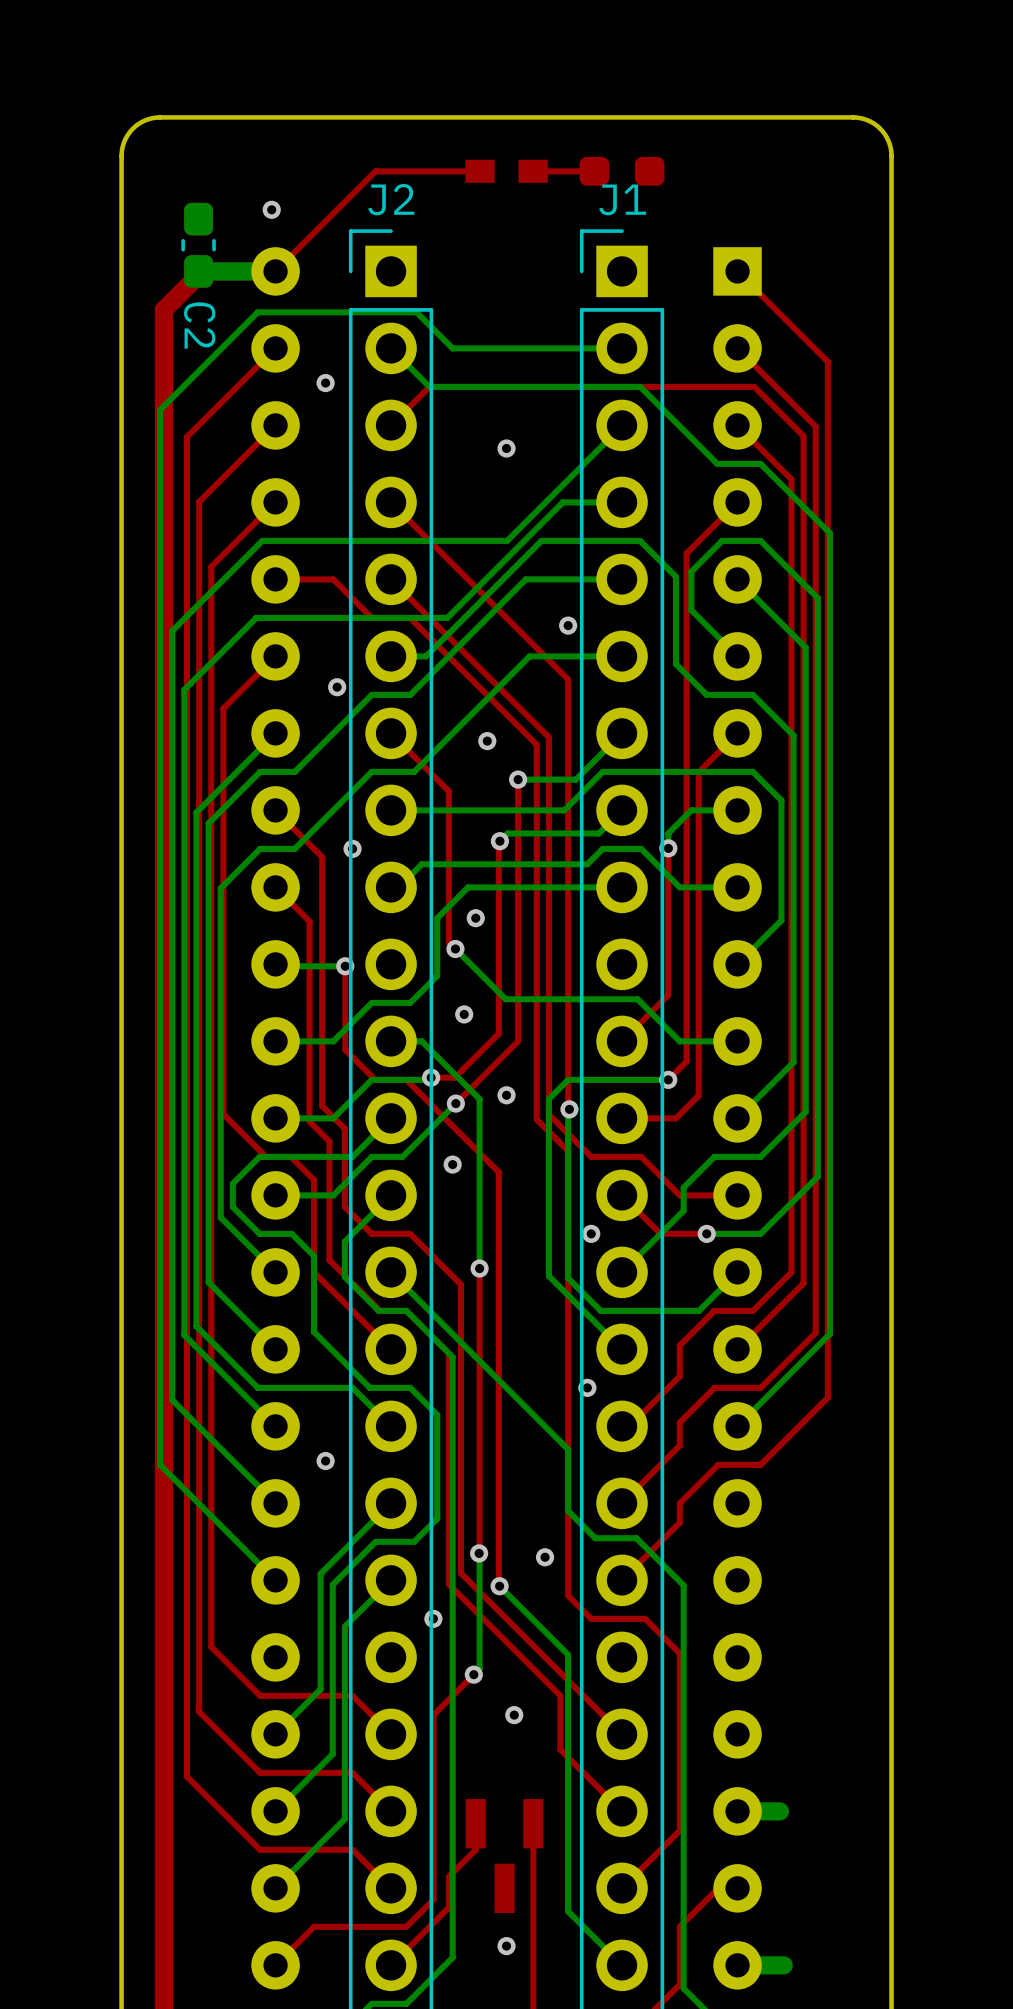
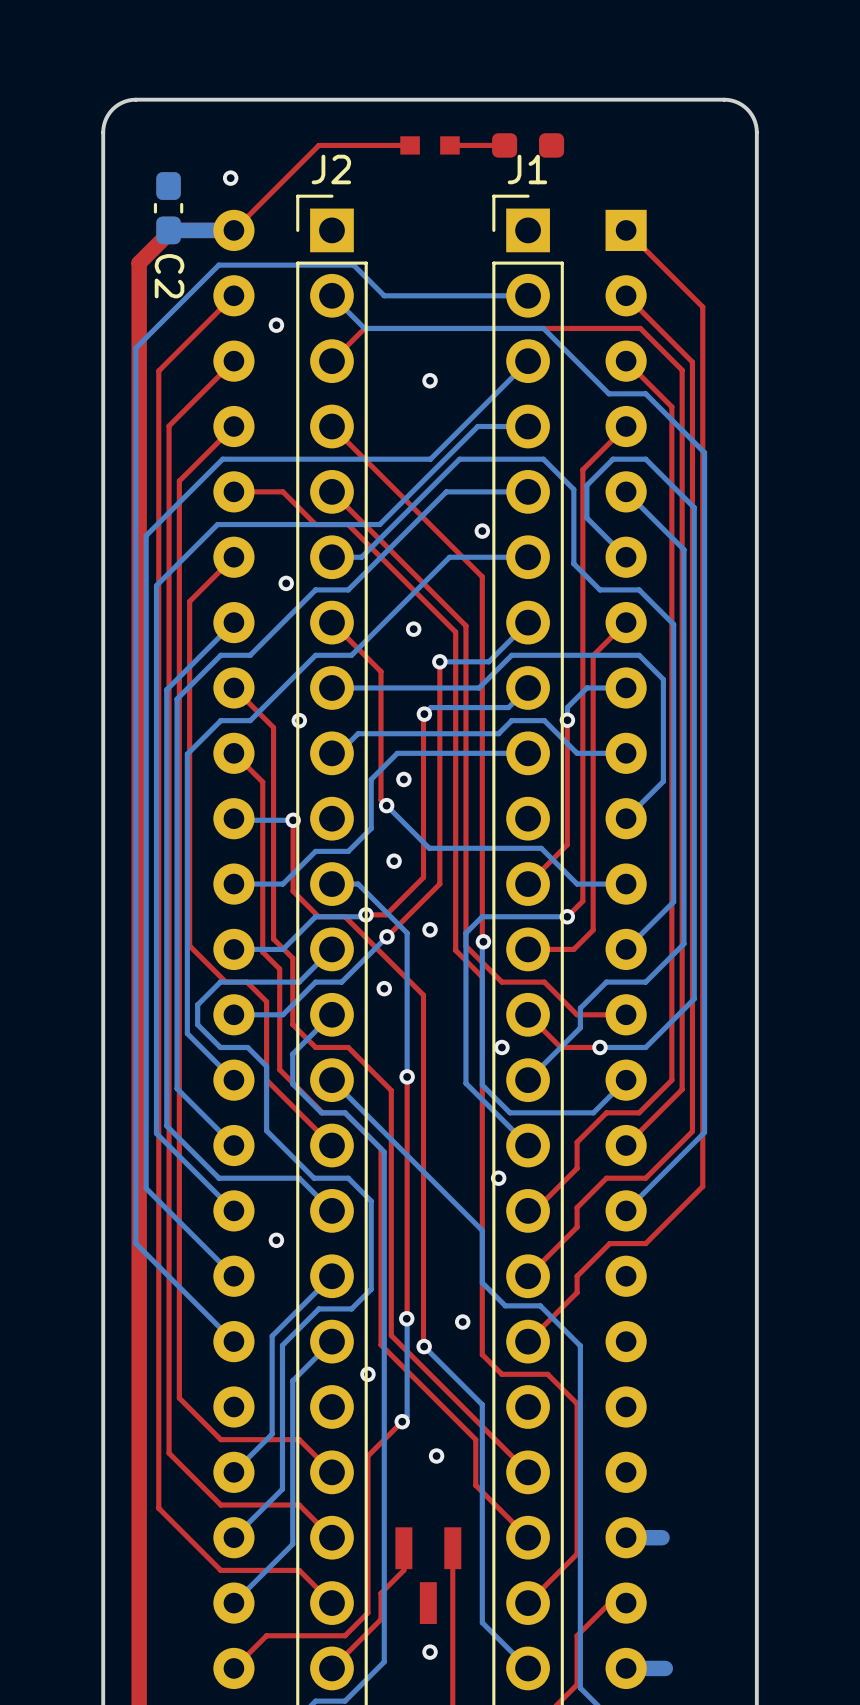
part footprint: [465, 159, 548, 183] -> [400, 136, 460, 155]

